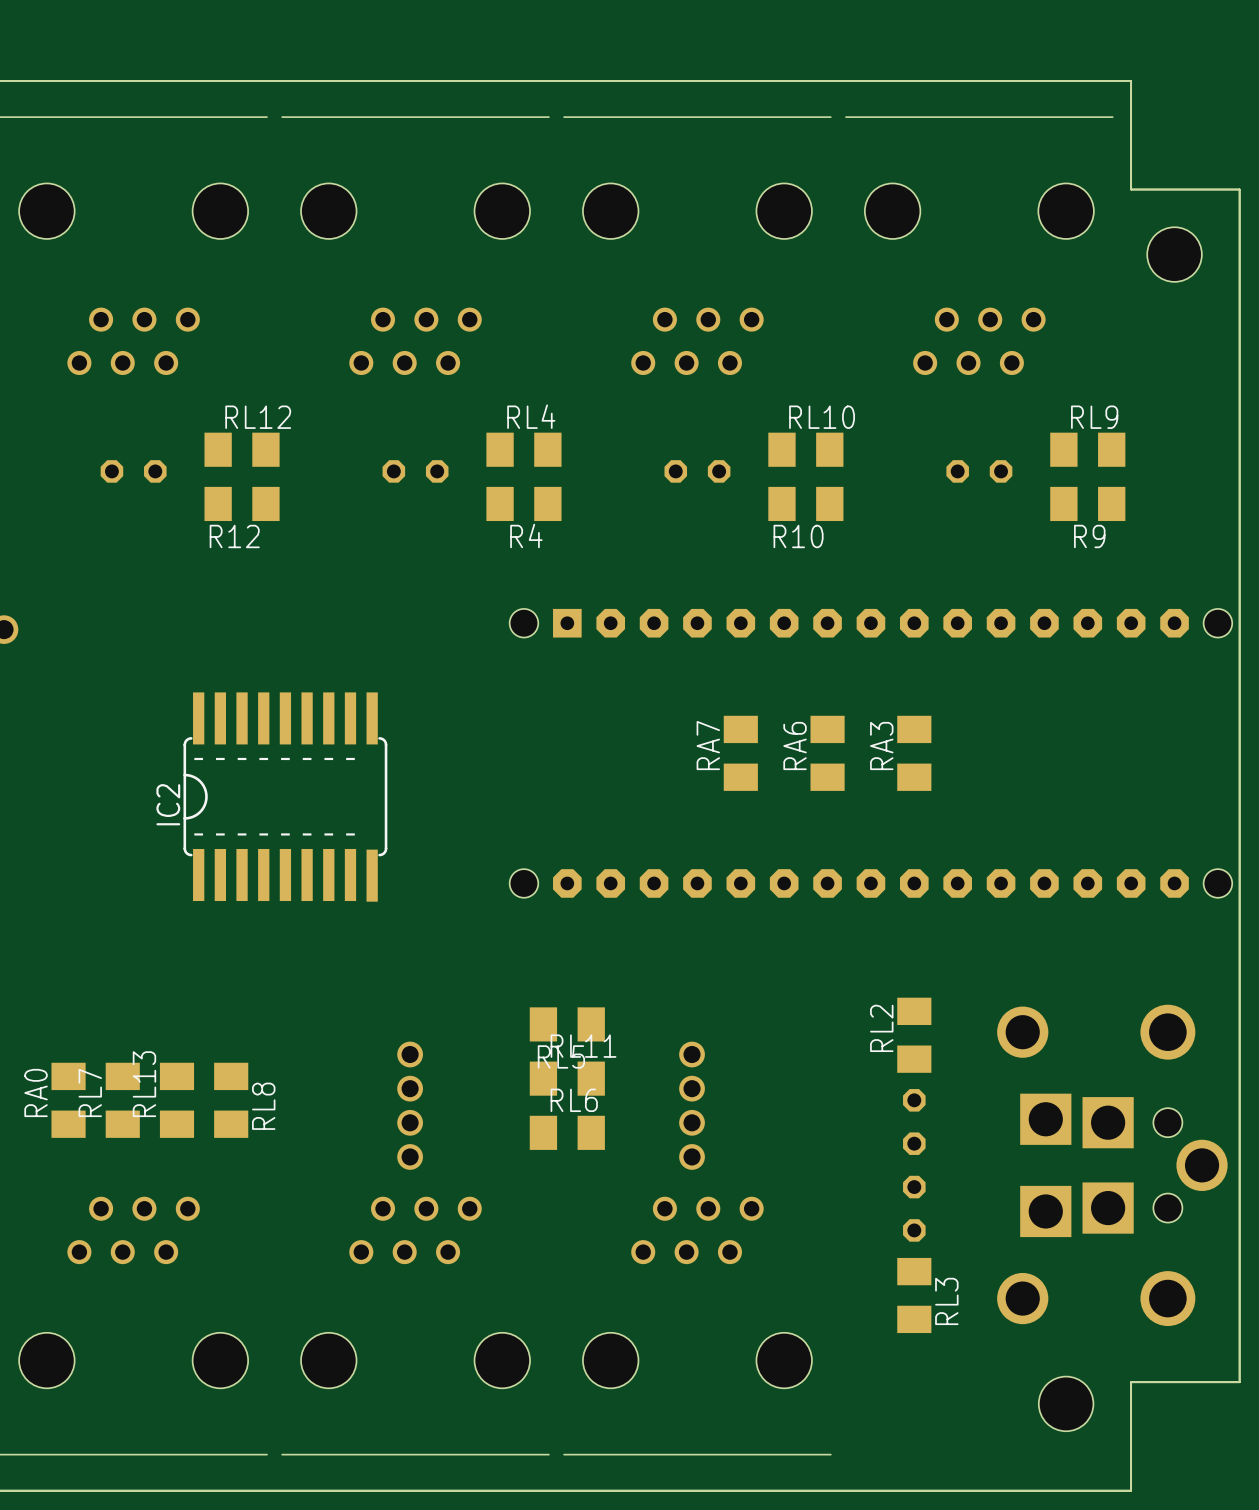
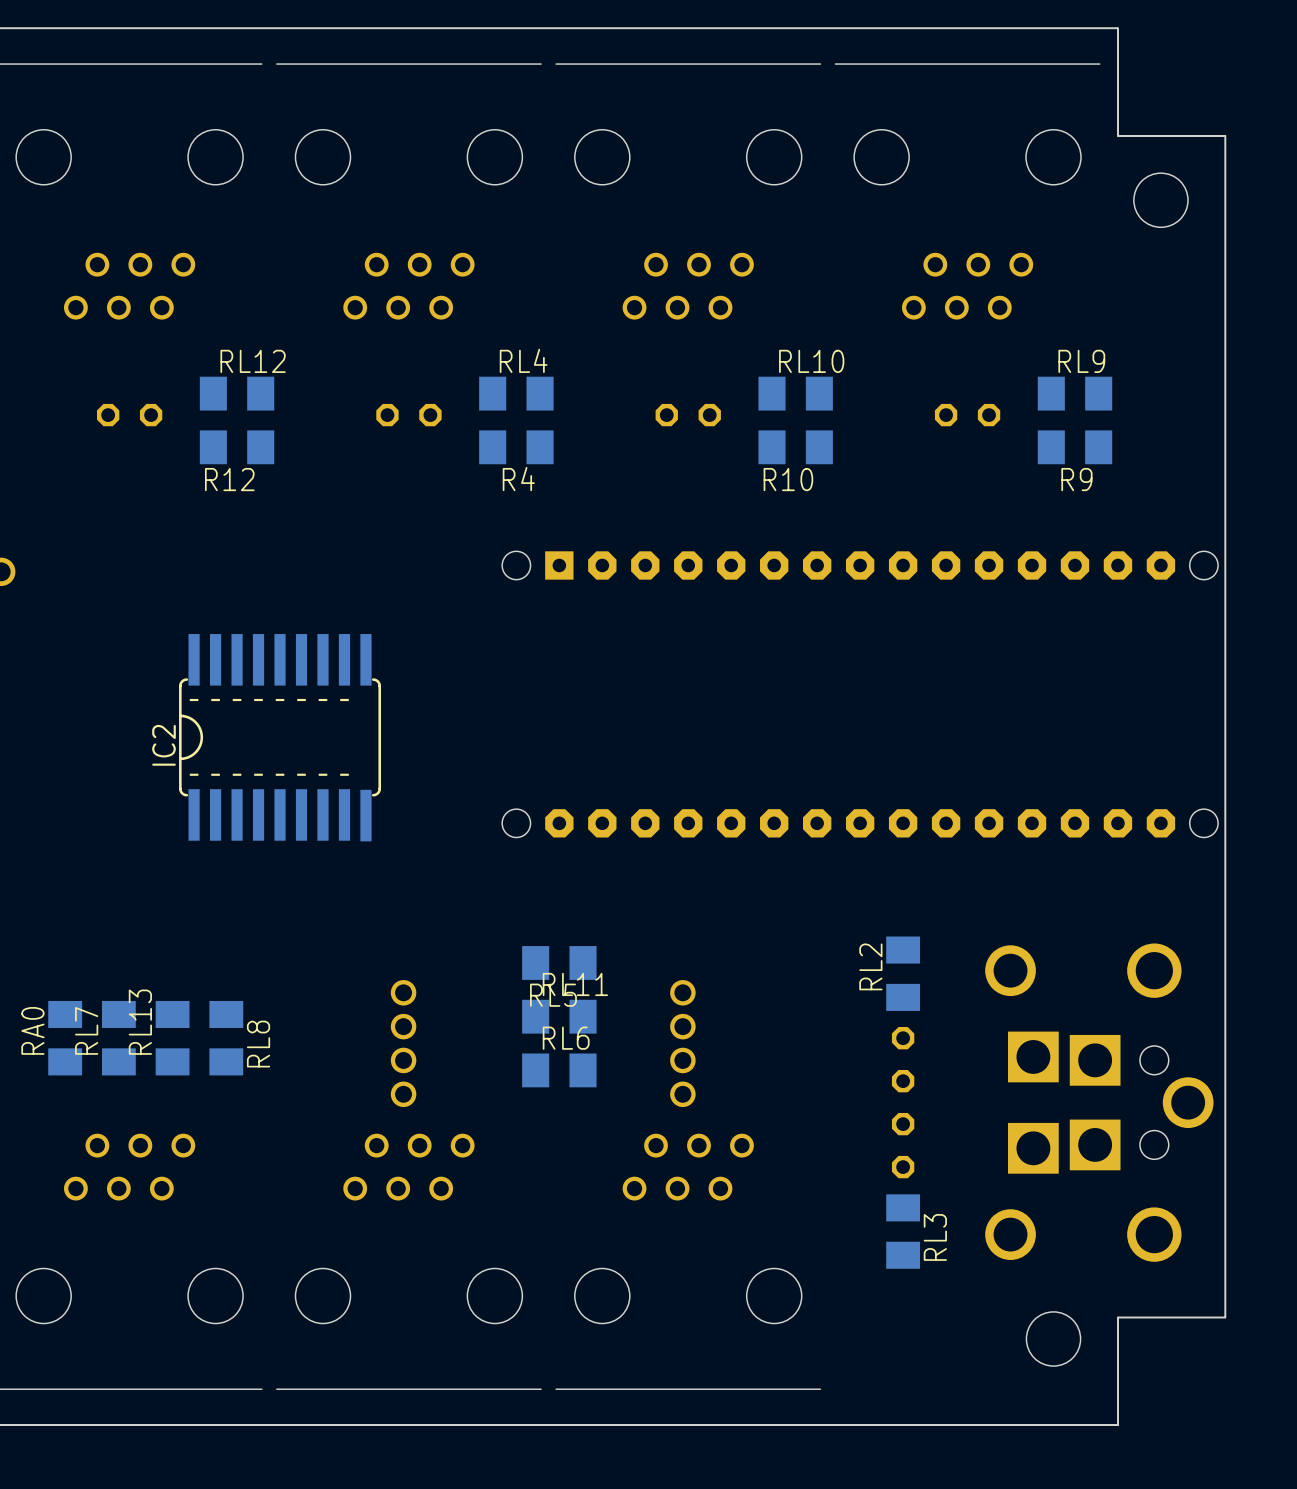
RA7: (740, 753) -> none
RA6: (827, 753) -> none
RA3: (914, 753) -> none

